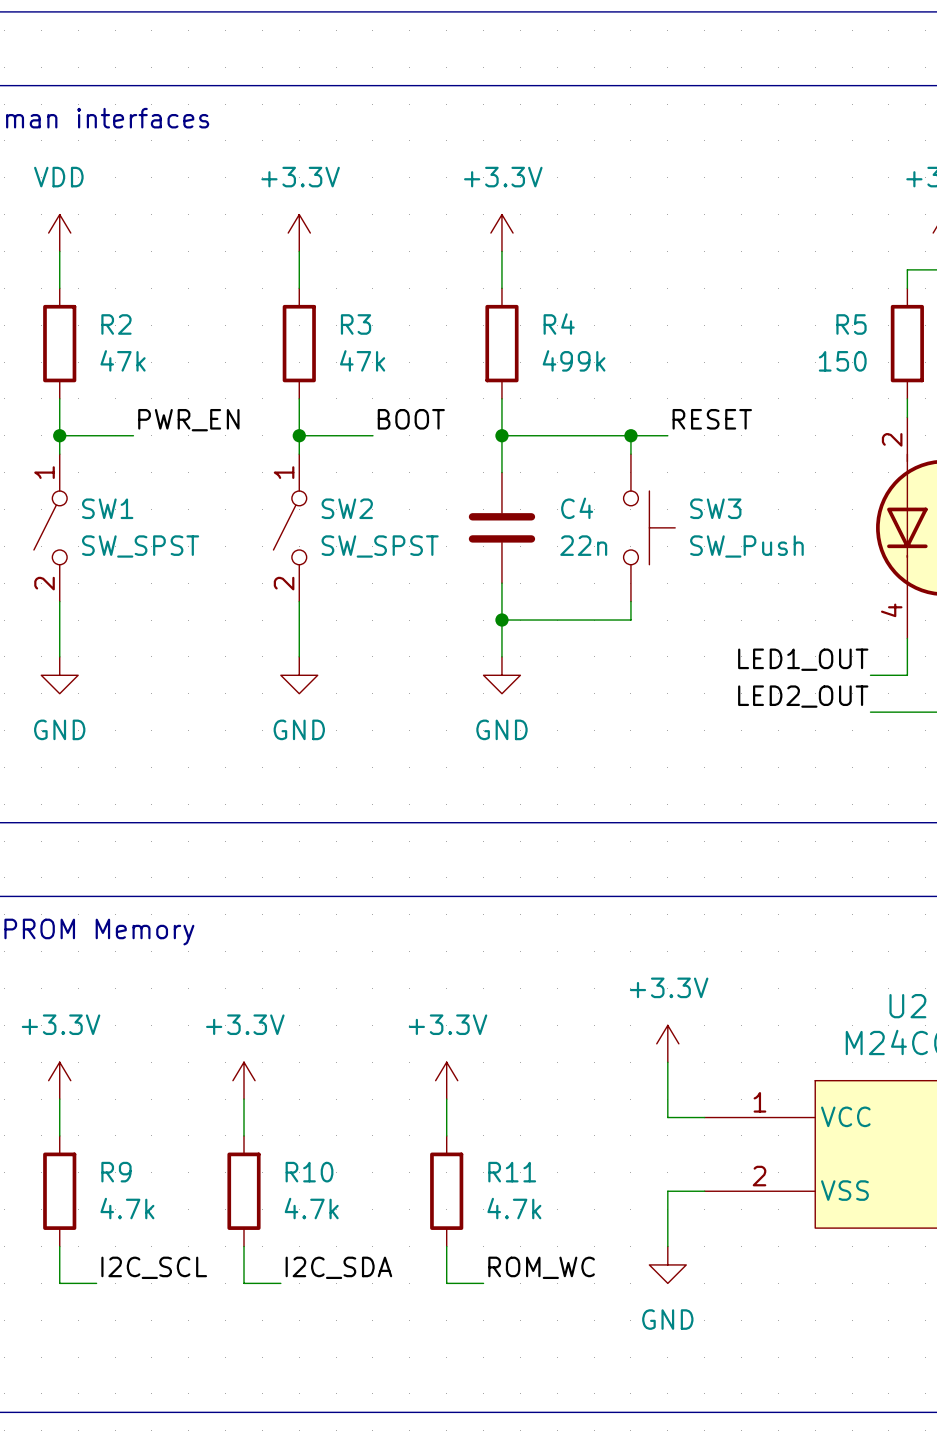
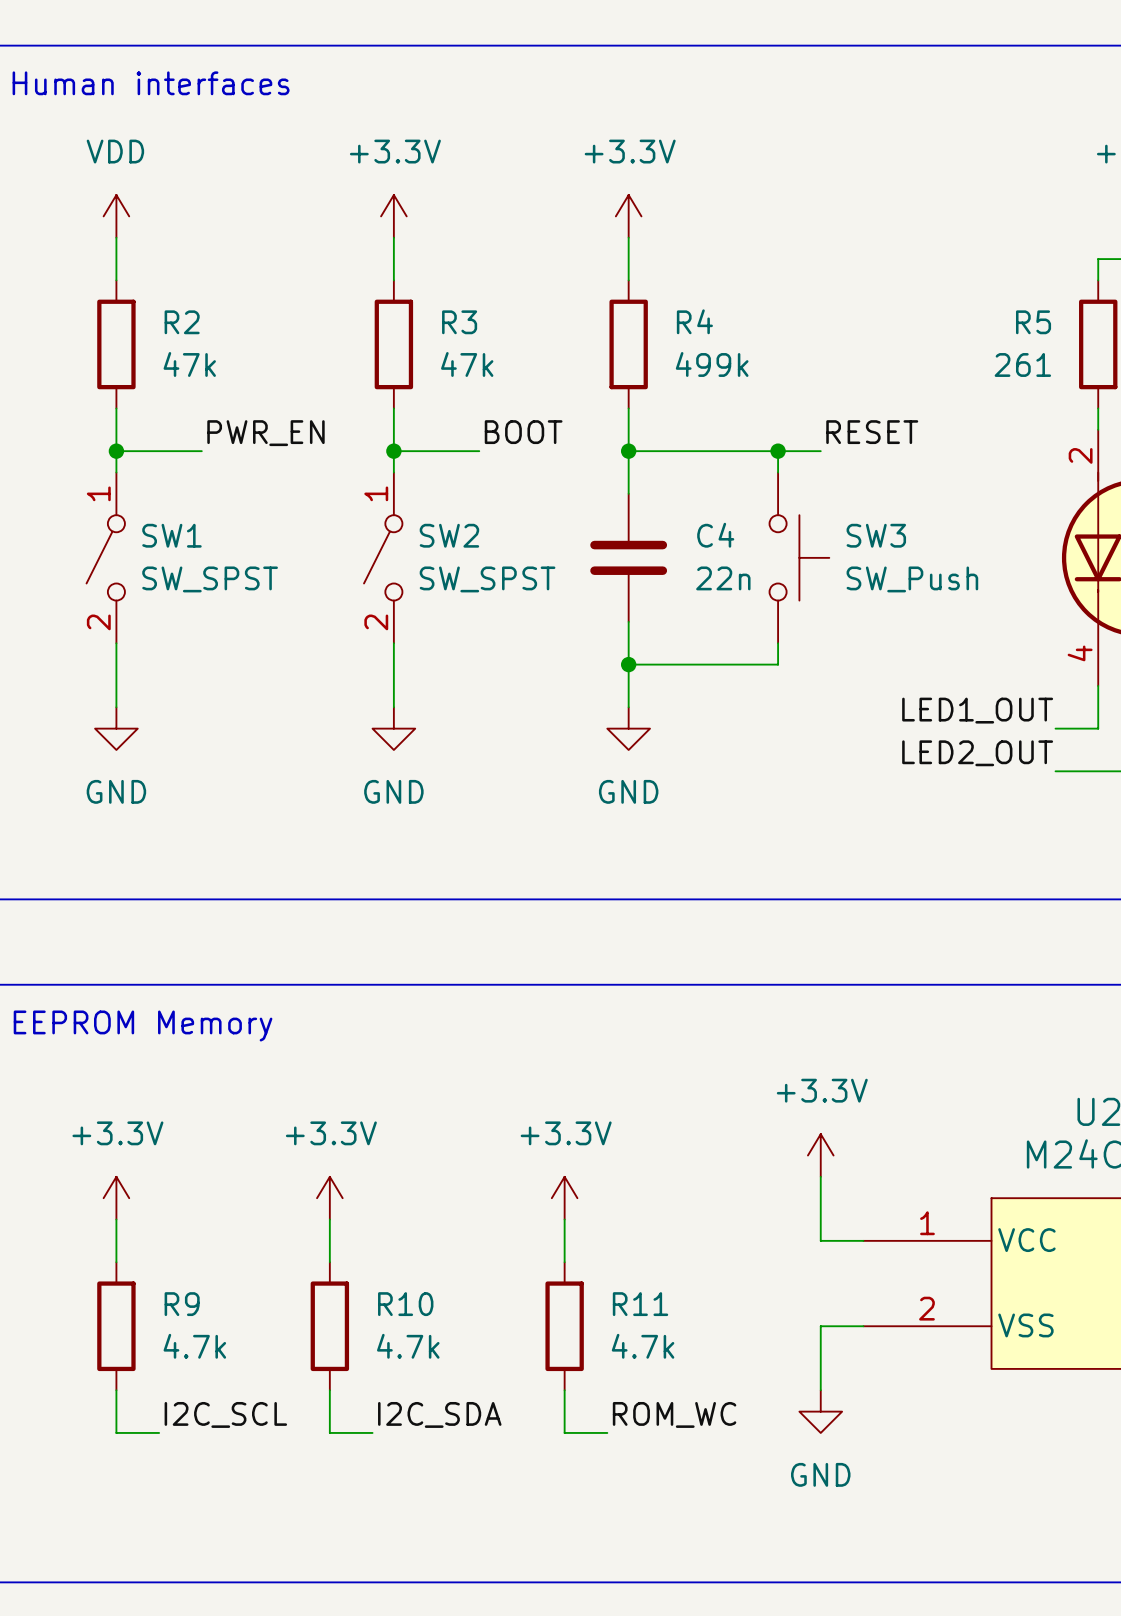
R5 value: 150 (842, 361) -> 261 (1022, 364)

